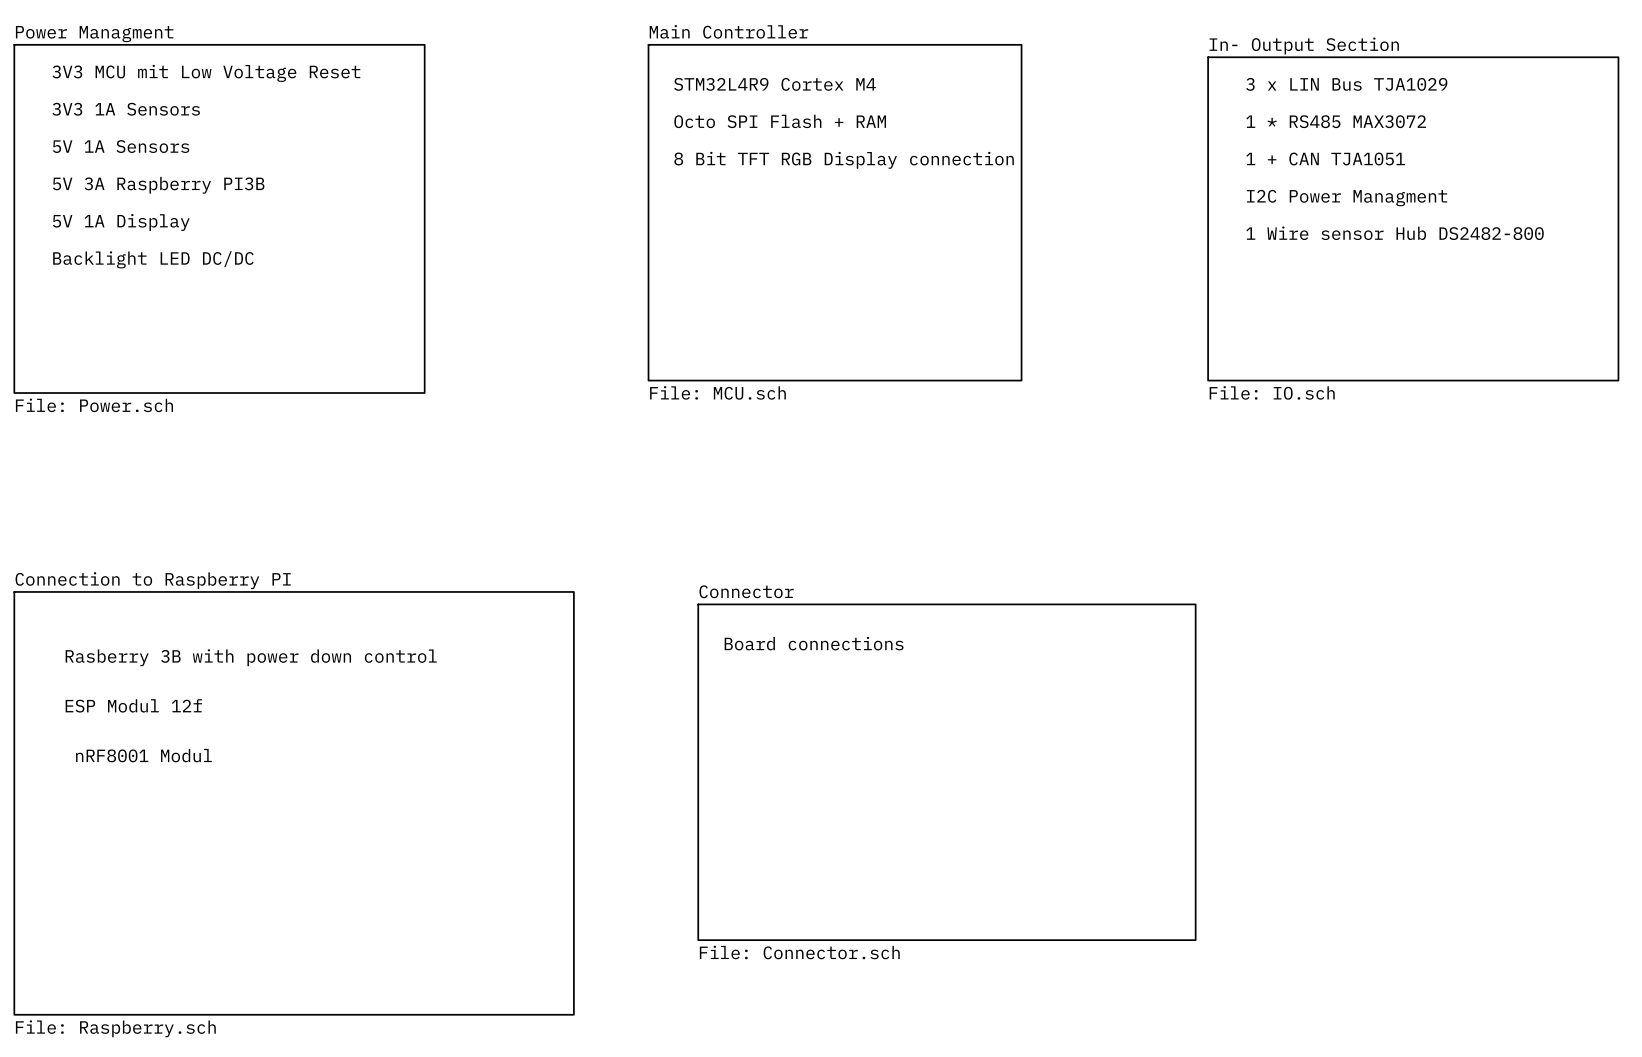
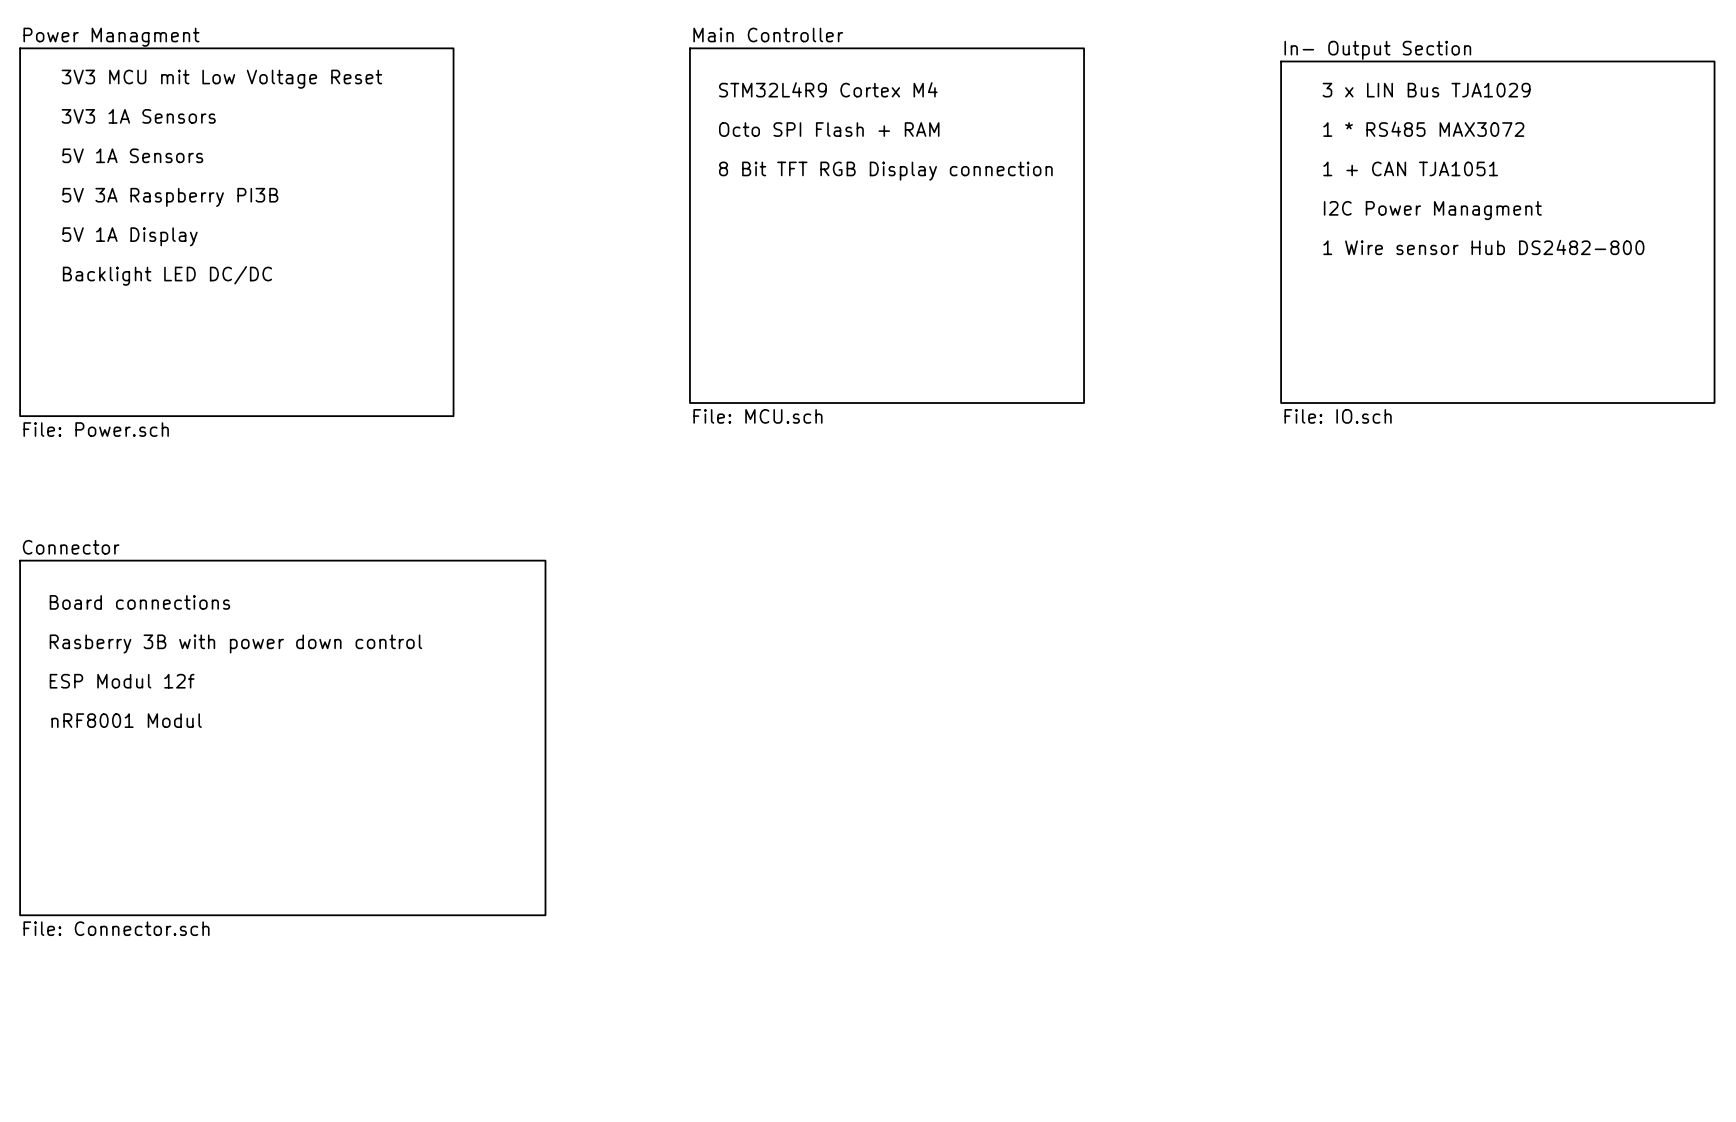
text: none -> Board connections (139, 602)
text: Board connections (814, 643) -> none
text position: Rasberry 3B with power down control (251, 657) -> Rasberry 3B with power down control (235, 644)
sheet Connector: none -> File: Connector.sch (282, 737)
text position: ESP Modul 12f (133, 705) -> ESP Modul 12f (122, 681)
text position: nRF8001 Modul (143, 755) -> nRF8001 Modul (126, 720)
sheet Connector: File: Connector.sch (946, 772) -> none
sheet Connection to Raspberry PI: File: Raspberry.sch (294, 803) -> none

